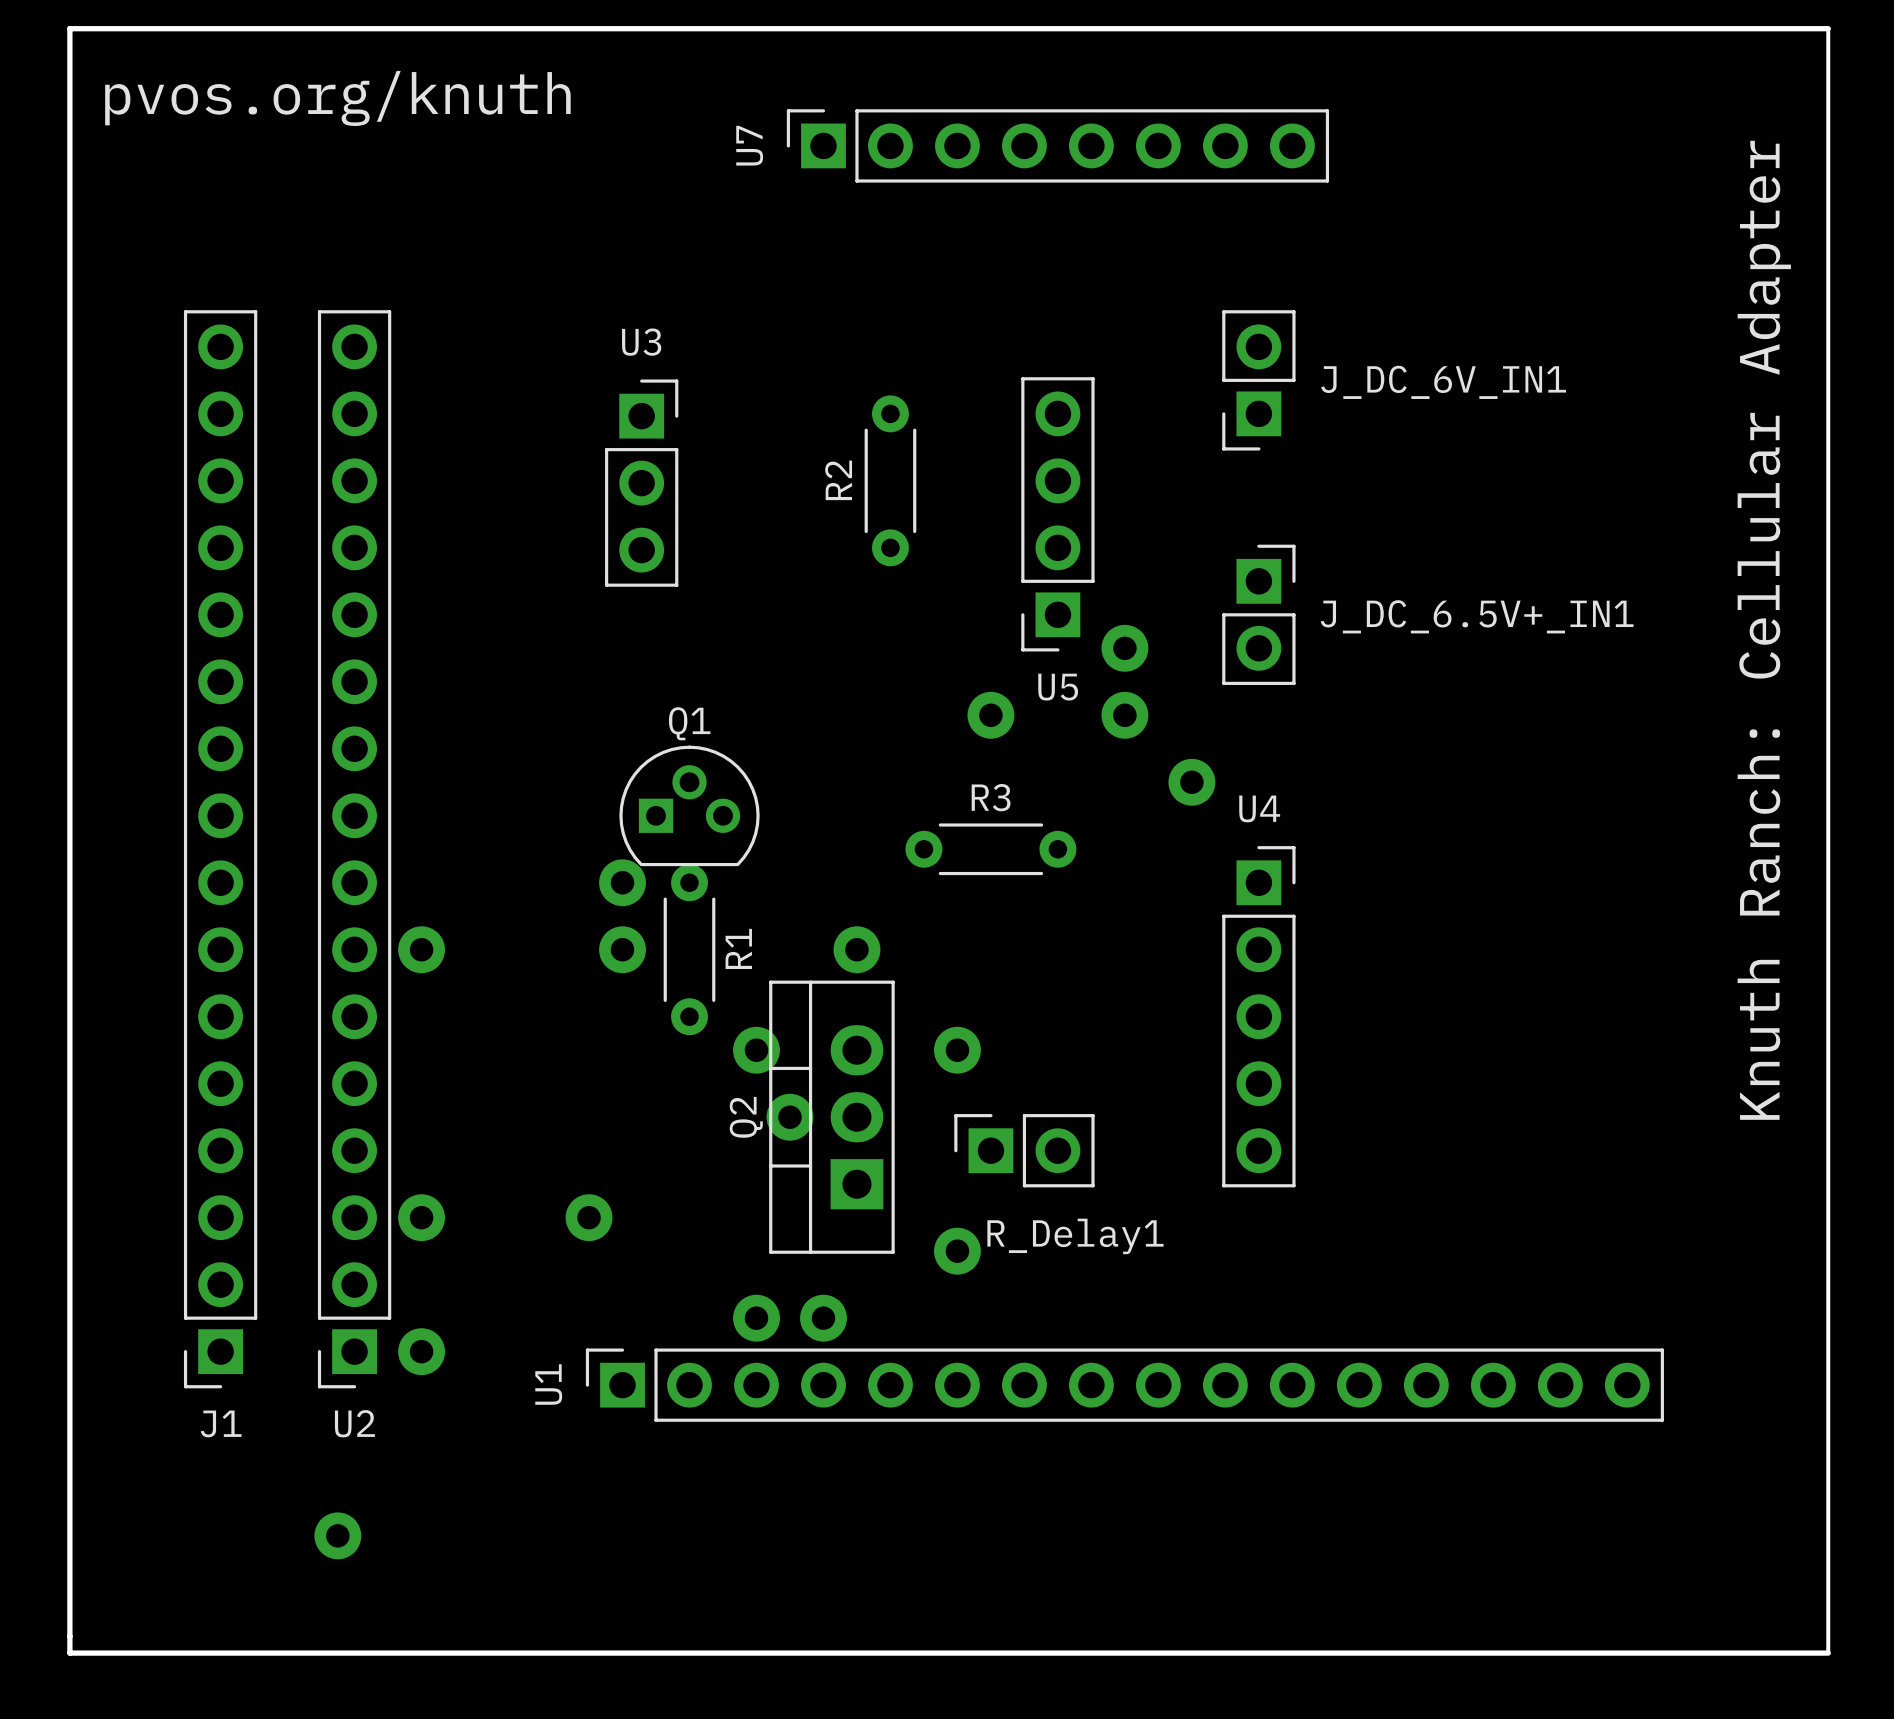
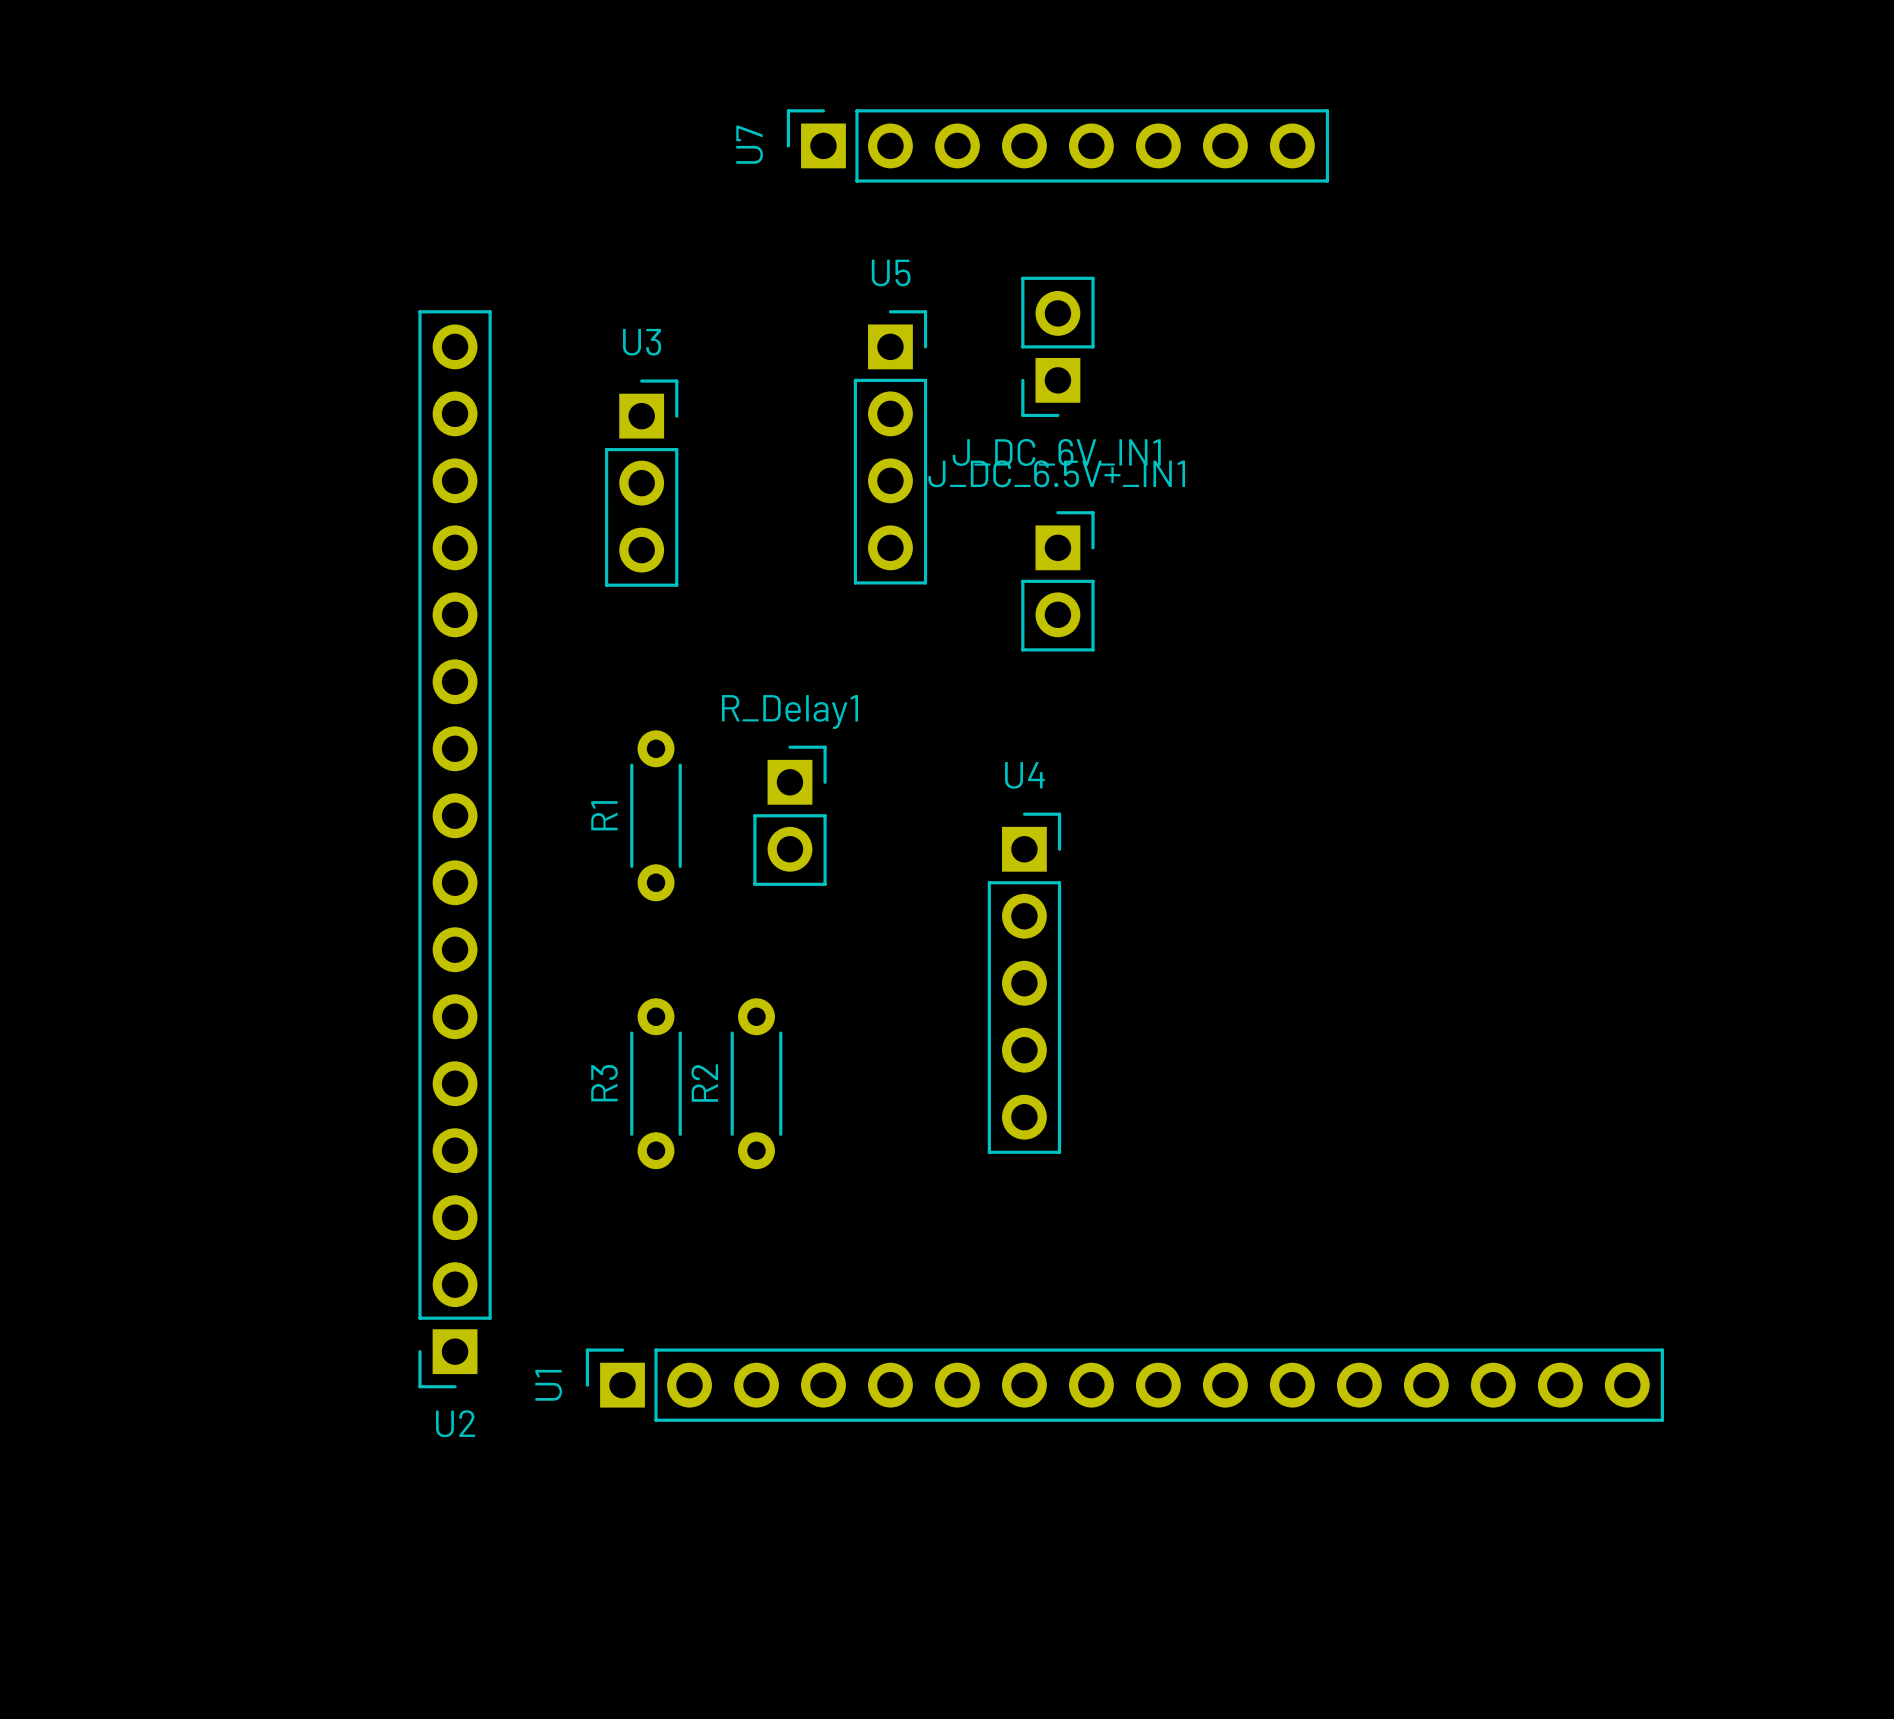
board edge: (69, 28) (69, 1653) (1828, 1653) (1828, 28) (69, 28) -> none
text: pvos.org/knuth (337, 98) -> none
J_DC_6V_IN1 position: (1258, 380) -> (1057, 346)
J_DC_6V_IN1 name position: J_DC_6V_IN1 (1443, 382) -> J_DC_6V_IN1 (1056, 452)
R2 position: (890, 480) -> (756, 1083)
U5 rotation: 0° (1057, 514) -> 180° (890, 447)
U5 position: (1057, 514) -> (890, 447)
J_DC_6.5V+_IN1 position: (1258, 614) -> (1057, 581)
J_DC_6.5V+_IN1 name position: J_DC_6.5V+_IN1 (1477, 616) -> J_DC_6.5V+_IN1 (1056, 473)
text: Knuth Ranch: Cellular Adapter (1764, 630) -> none
via: (1124, 648) -> none
via: (990, 715) -> none
via: (1124, 715) -> none
via: (1191, 782) -> none
R3 name position: R3 (991, 797) -> R3 (604, 1083)
Q1: (689, 805) -> none
J1: (220, 849) -> none
U2 position: (354, 849) -> (455, 849)
R3 rotation: 0° (990, 849) -> 90° clockwise (656, 1083)
R3 position: (990, 849) -> (656, 1083)
via: (622, 882) -> none
R1 name position: R1 (738, 948) -> R1 (604, 815)
via: (421, 949) -> none
via: (622, 949) -> none
R1 position: (689, 949) -> (656, 815)
via: (856, 949) -> none
U4 position: (1258, 1016) -> (1024, 983)
via: (756, 1050) -> none
via: (957, 1050) -> none
via: (789, 1117) -> none
Q2: (831, 1117) -> none
R_Delay1 rotation: 0° (1024, 1150) -> 90° clockwise (789, 815)
R_Delay1 position: (1024, 1150) -> (789, 815)
via: (421, 1217) -> none
via: (589, 1217) -> none
R_Delay1 name position: R_Delay1 (1075, 1236) -> R_Delay1 (790, 712)
via: (957, 1251) -> none
via: (756, 1318) -> none
via: (823, 1318) -> none
via: (421, 1351) -> none
via: (337, 1535) -> none

